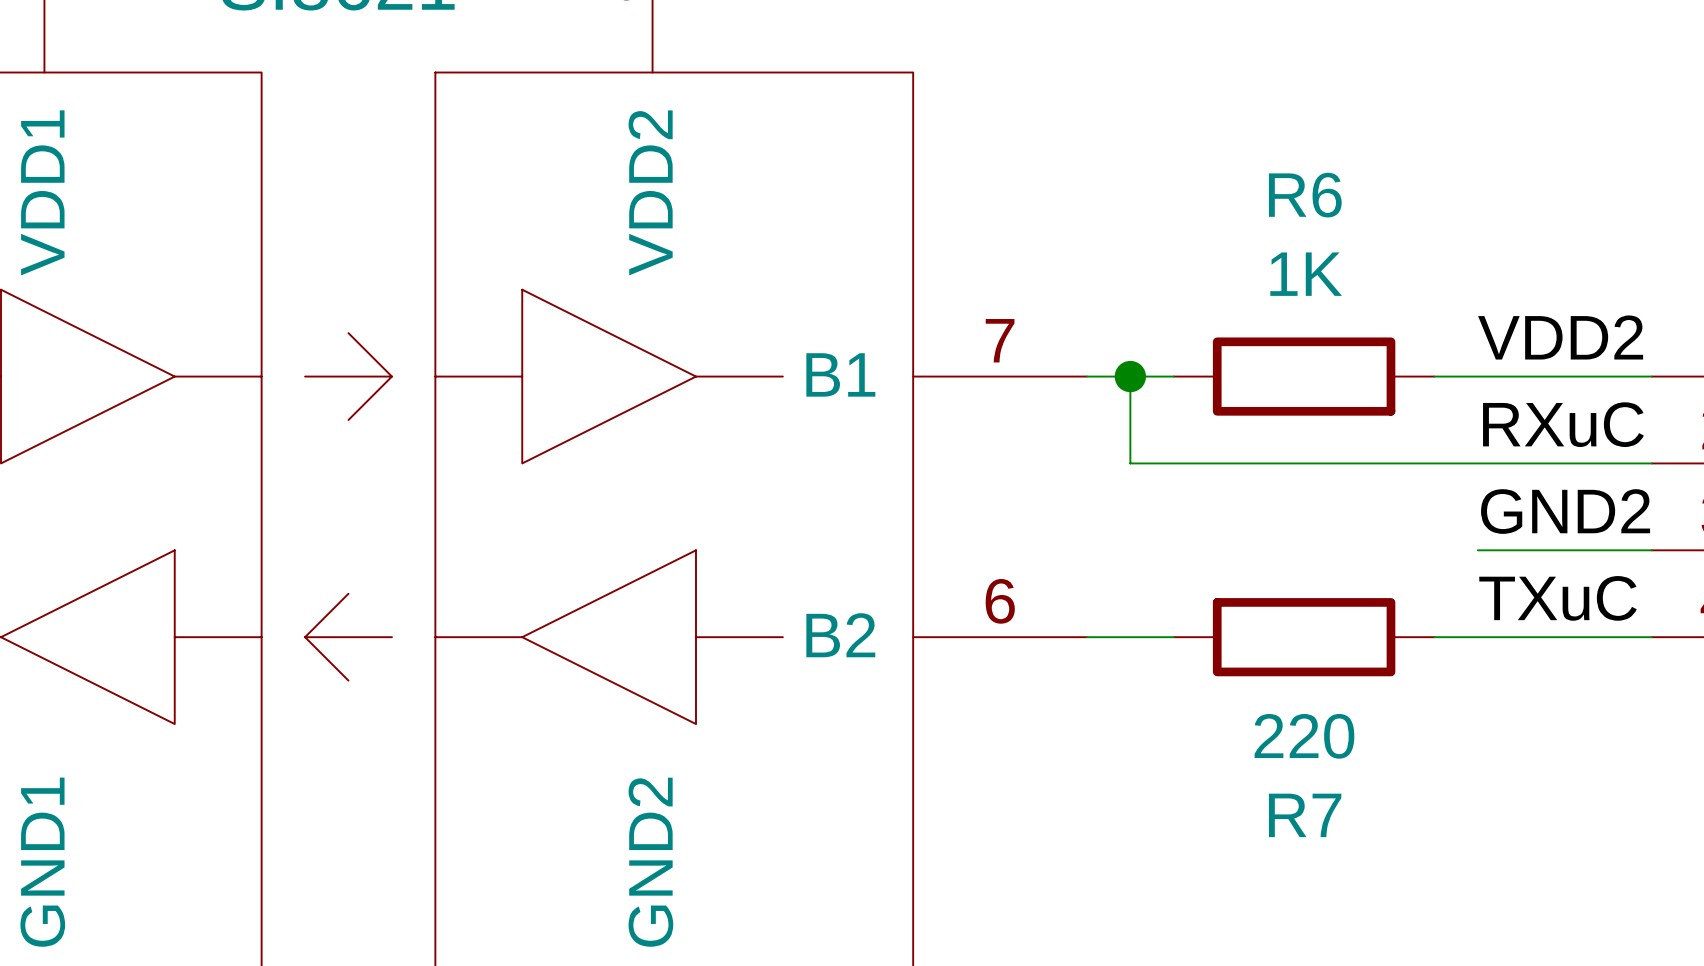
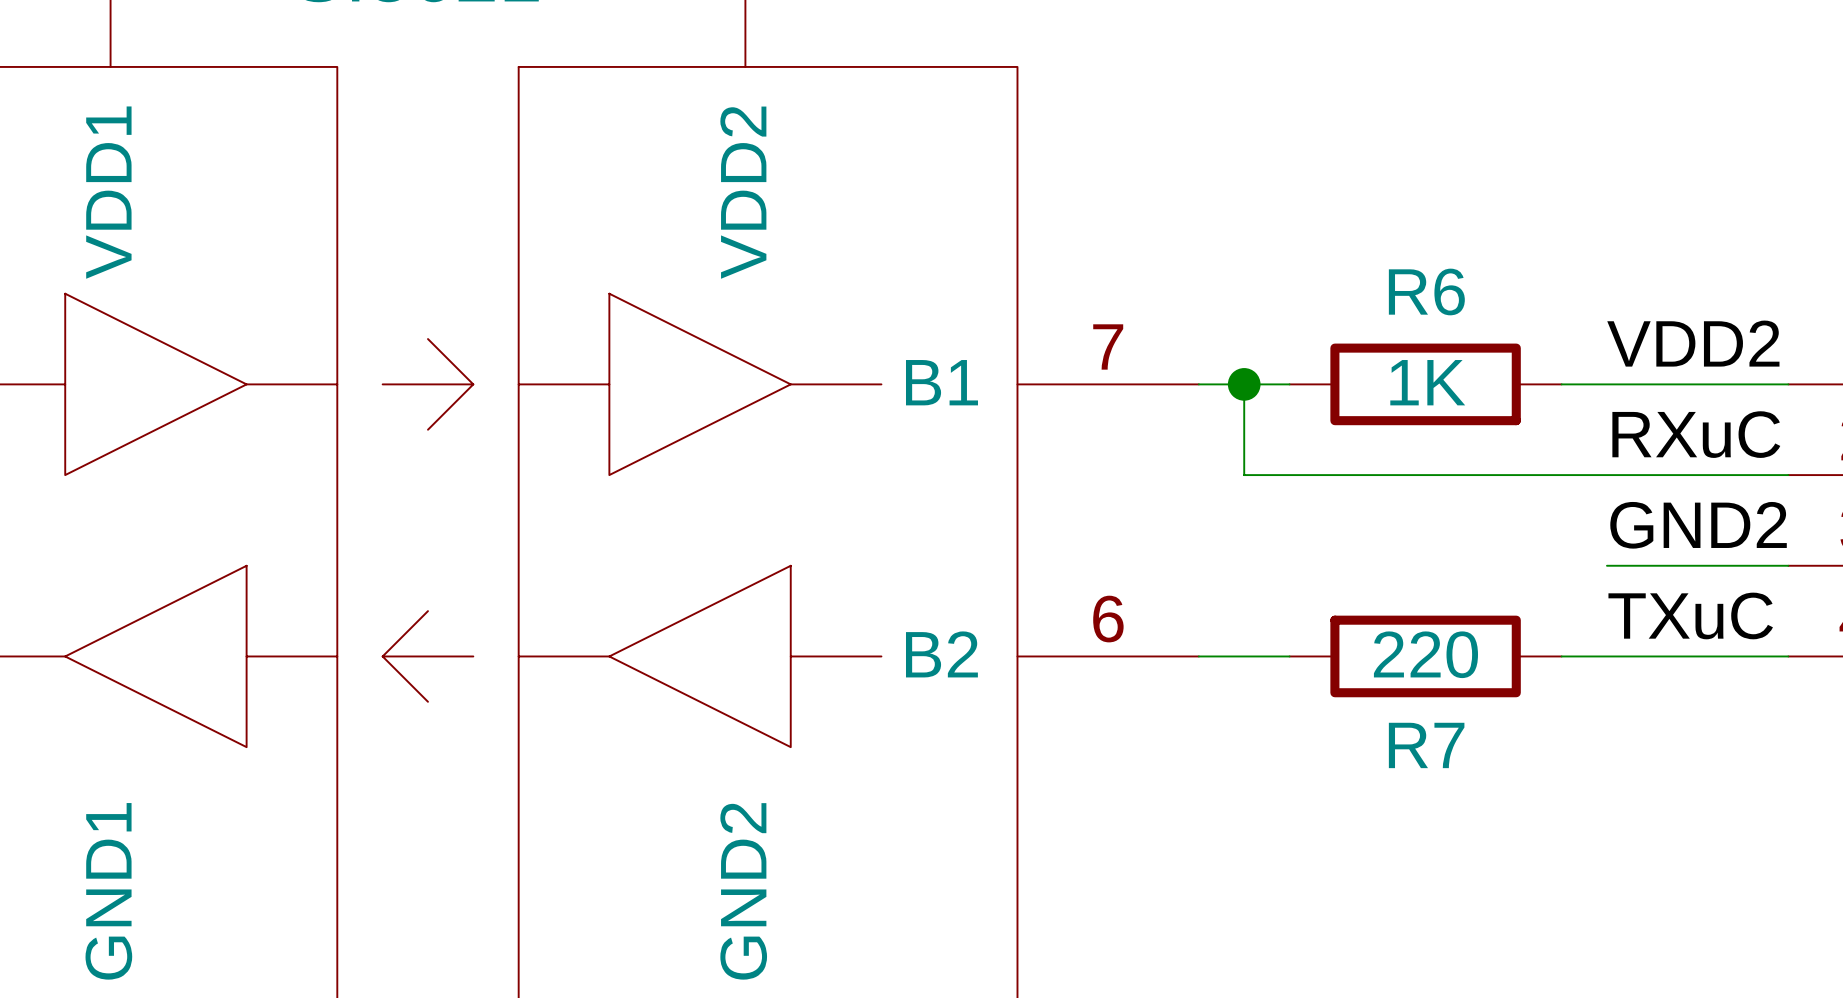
R6 name position: R6 (1305, 195) -> R6 (1426, 291)
R6 value position: 1K (1306, 274) -> 1K (1427, 382)
R7 value position: 220 (1304, 736) -> 220 (1425, 654)
R7 name position: R7 (1305, 815) -> R7 (1426, 745)

